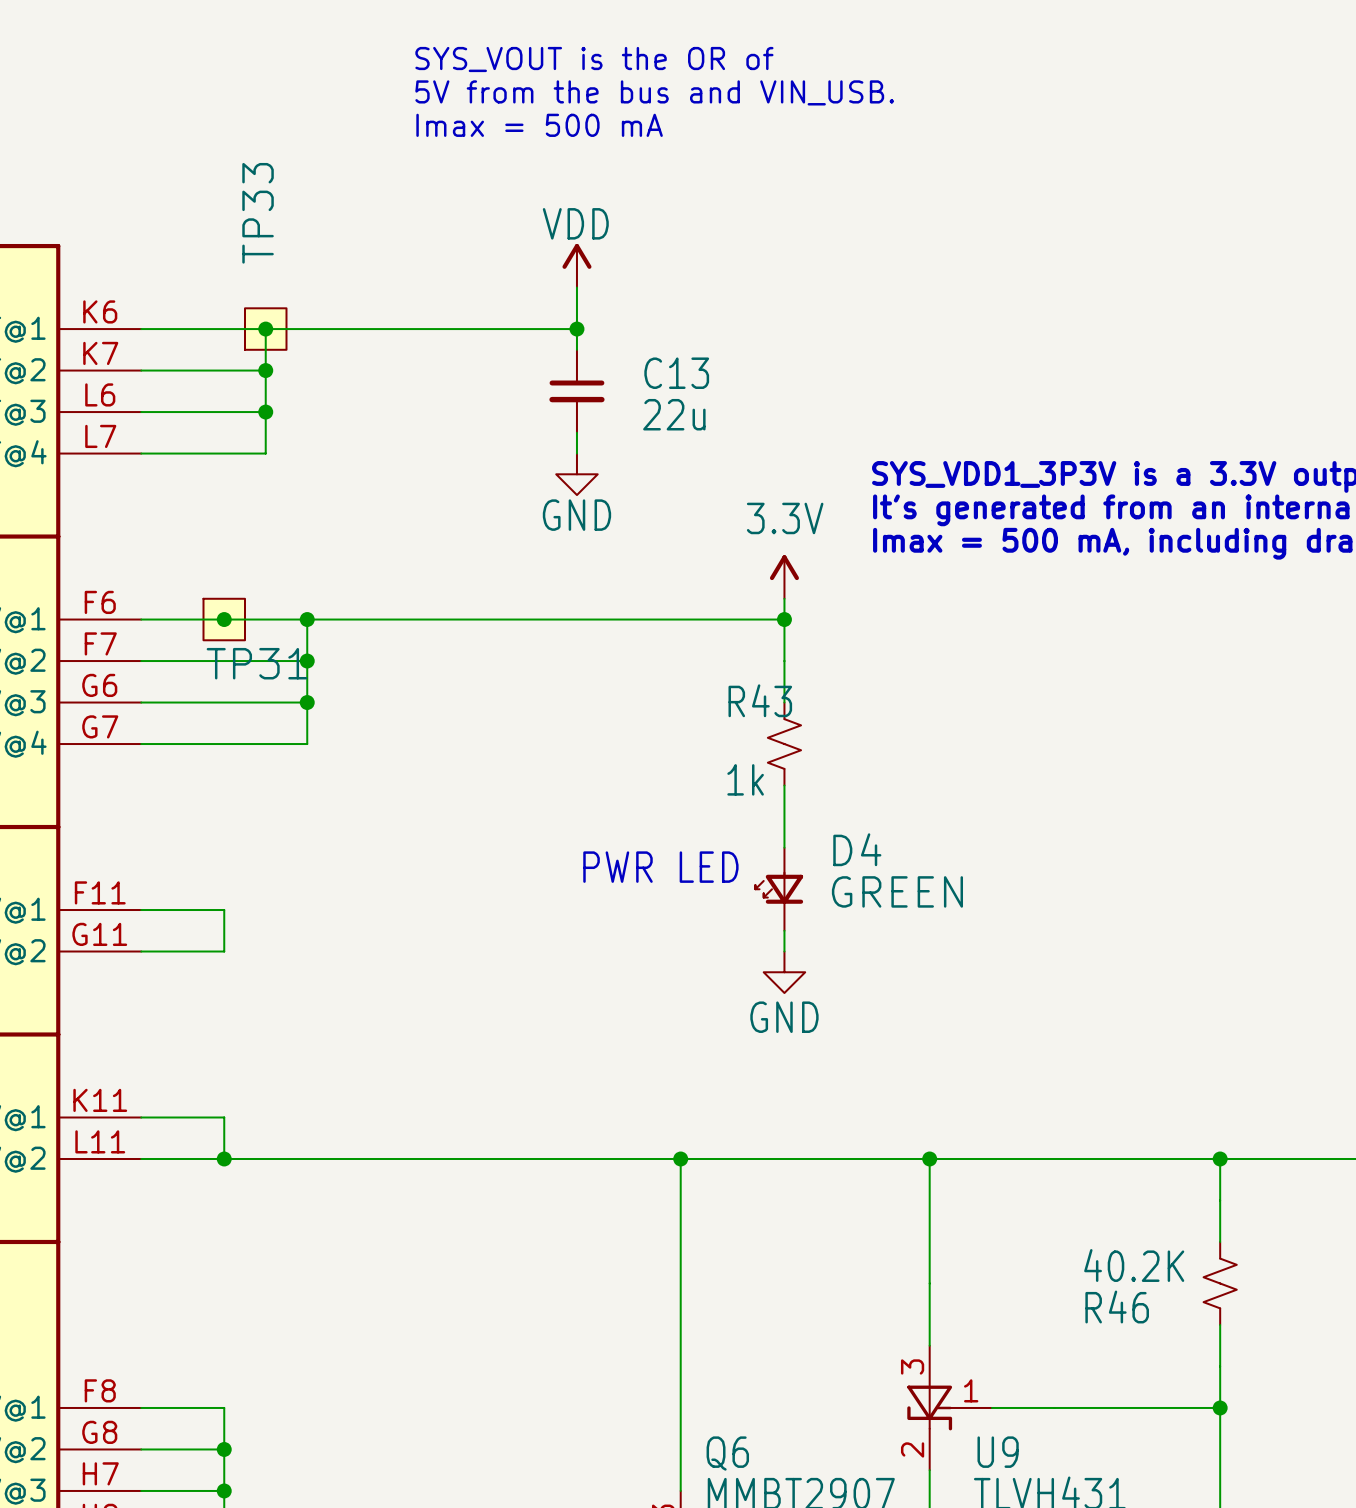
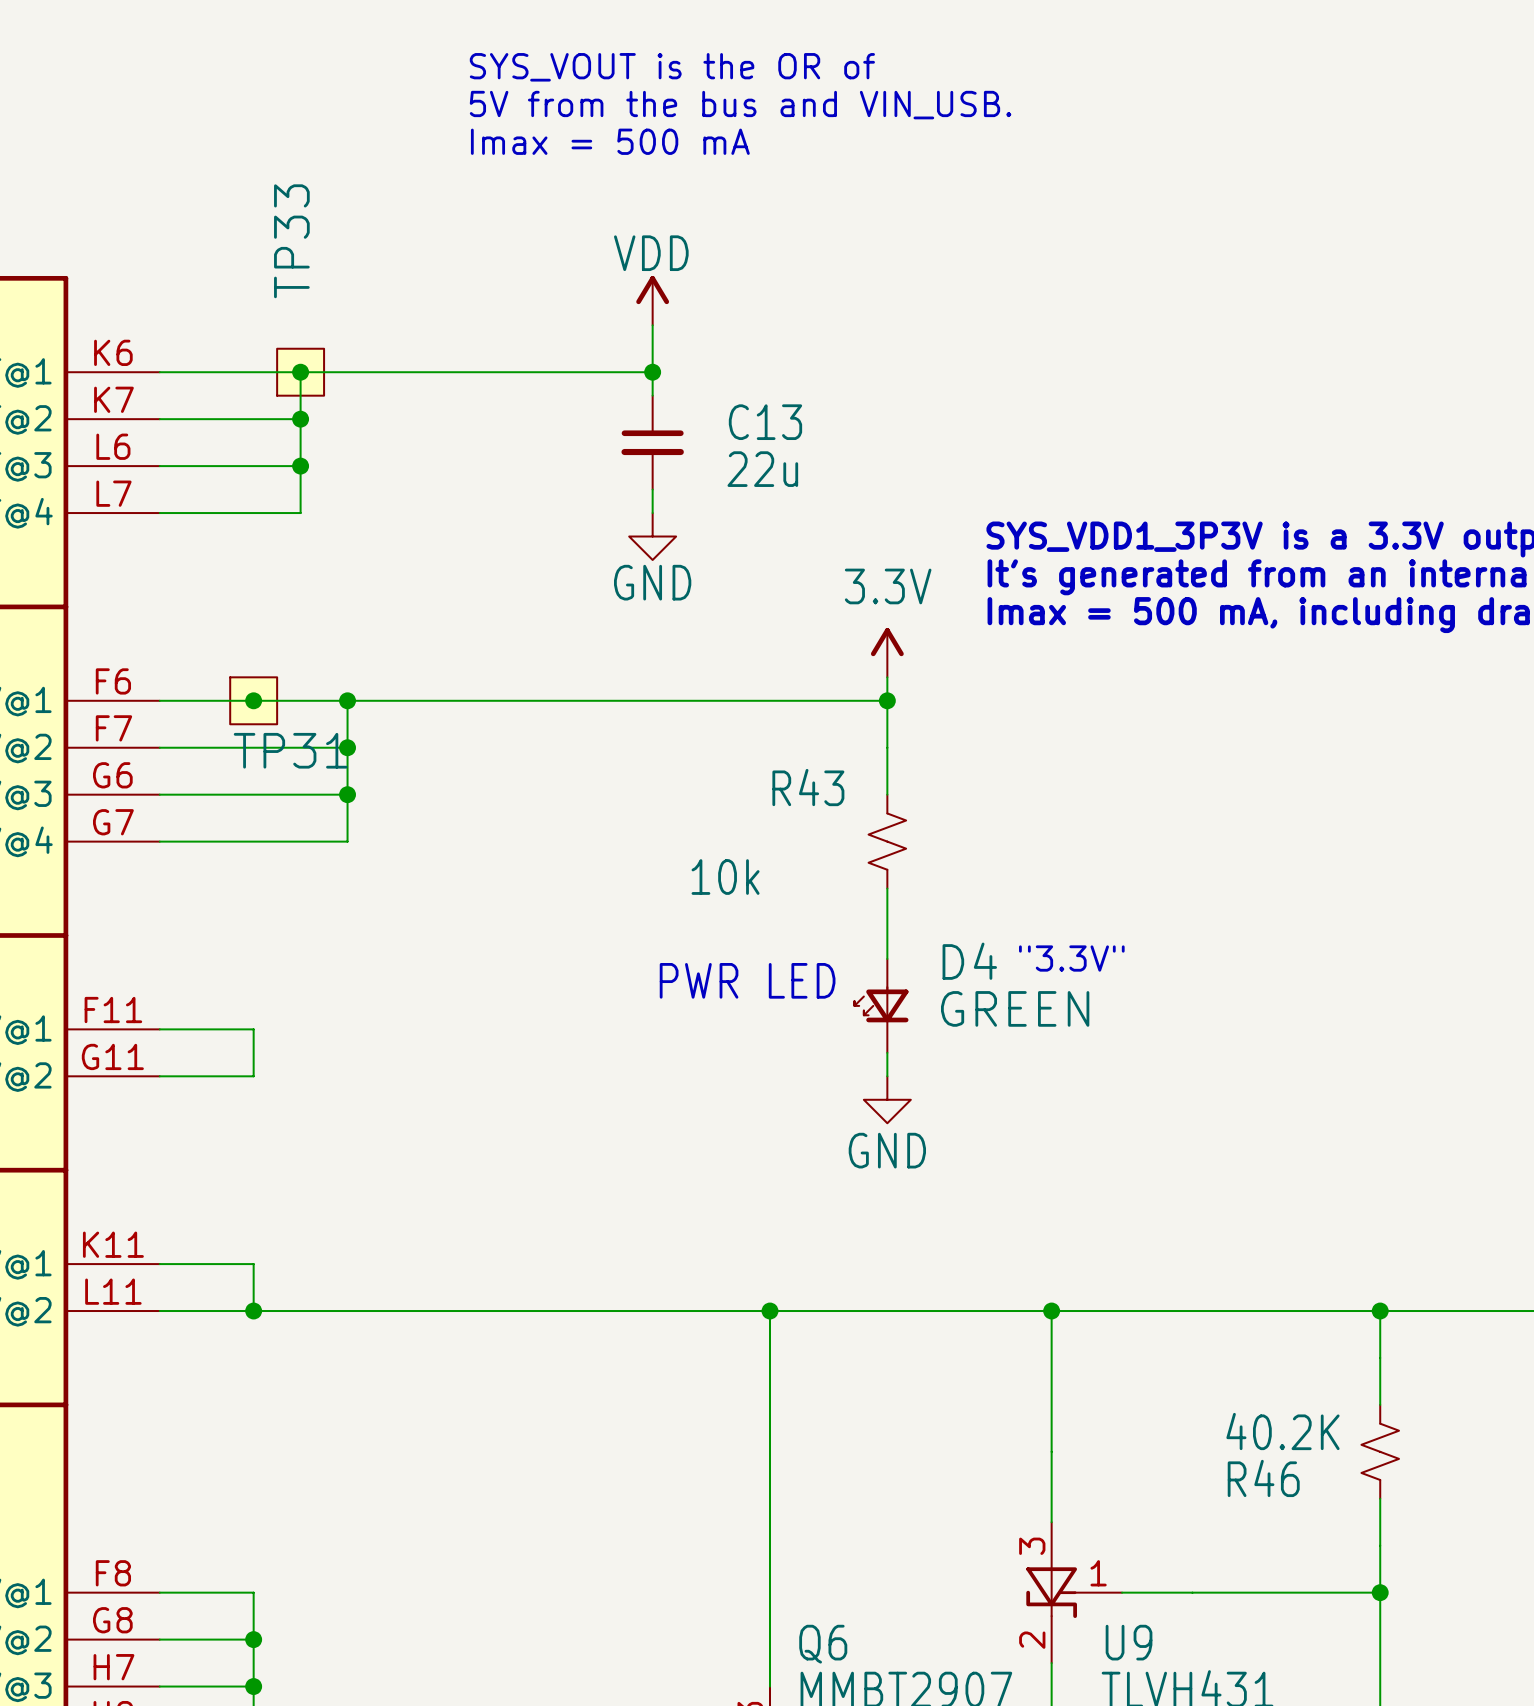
R43 name position: R43 (760, 700) -> R43 (808, 787)
R43 value: 1k (745, 779) -> 10k (725, 877)
text: none -> "3.3V" (1071, 958)

